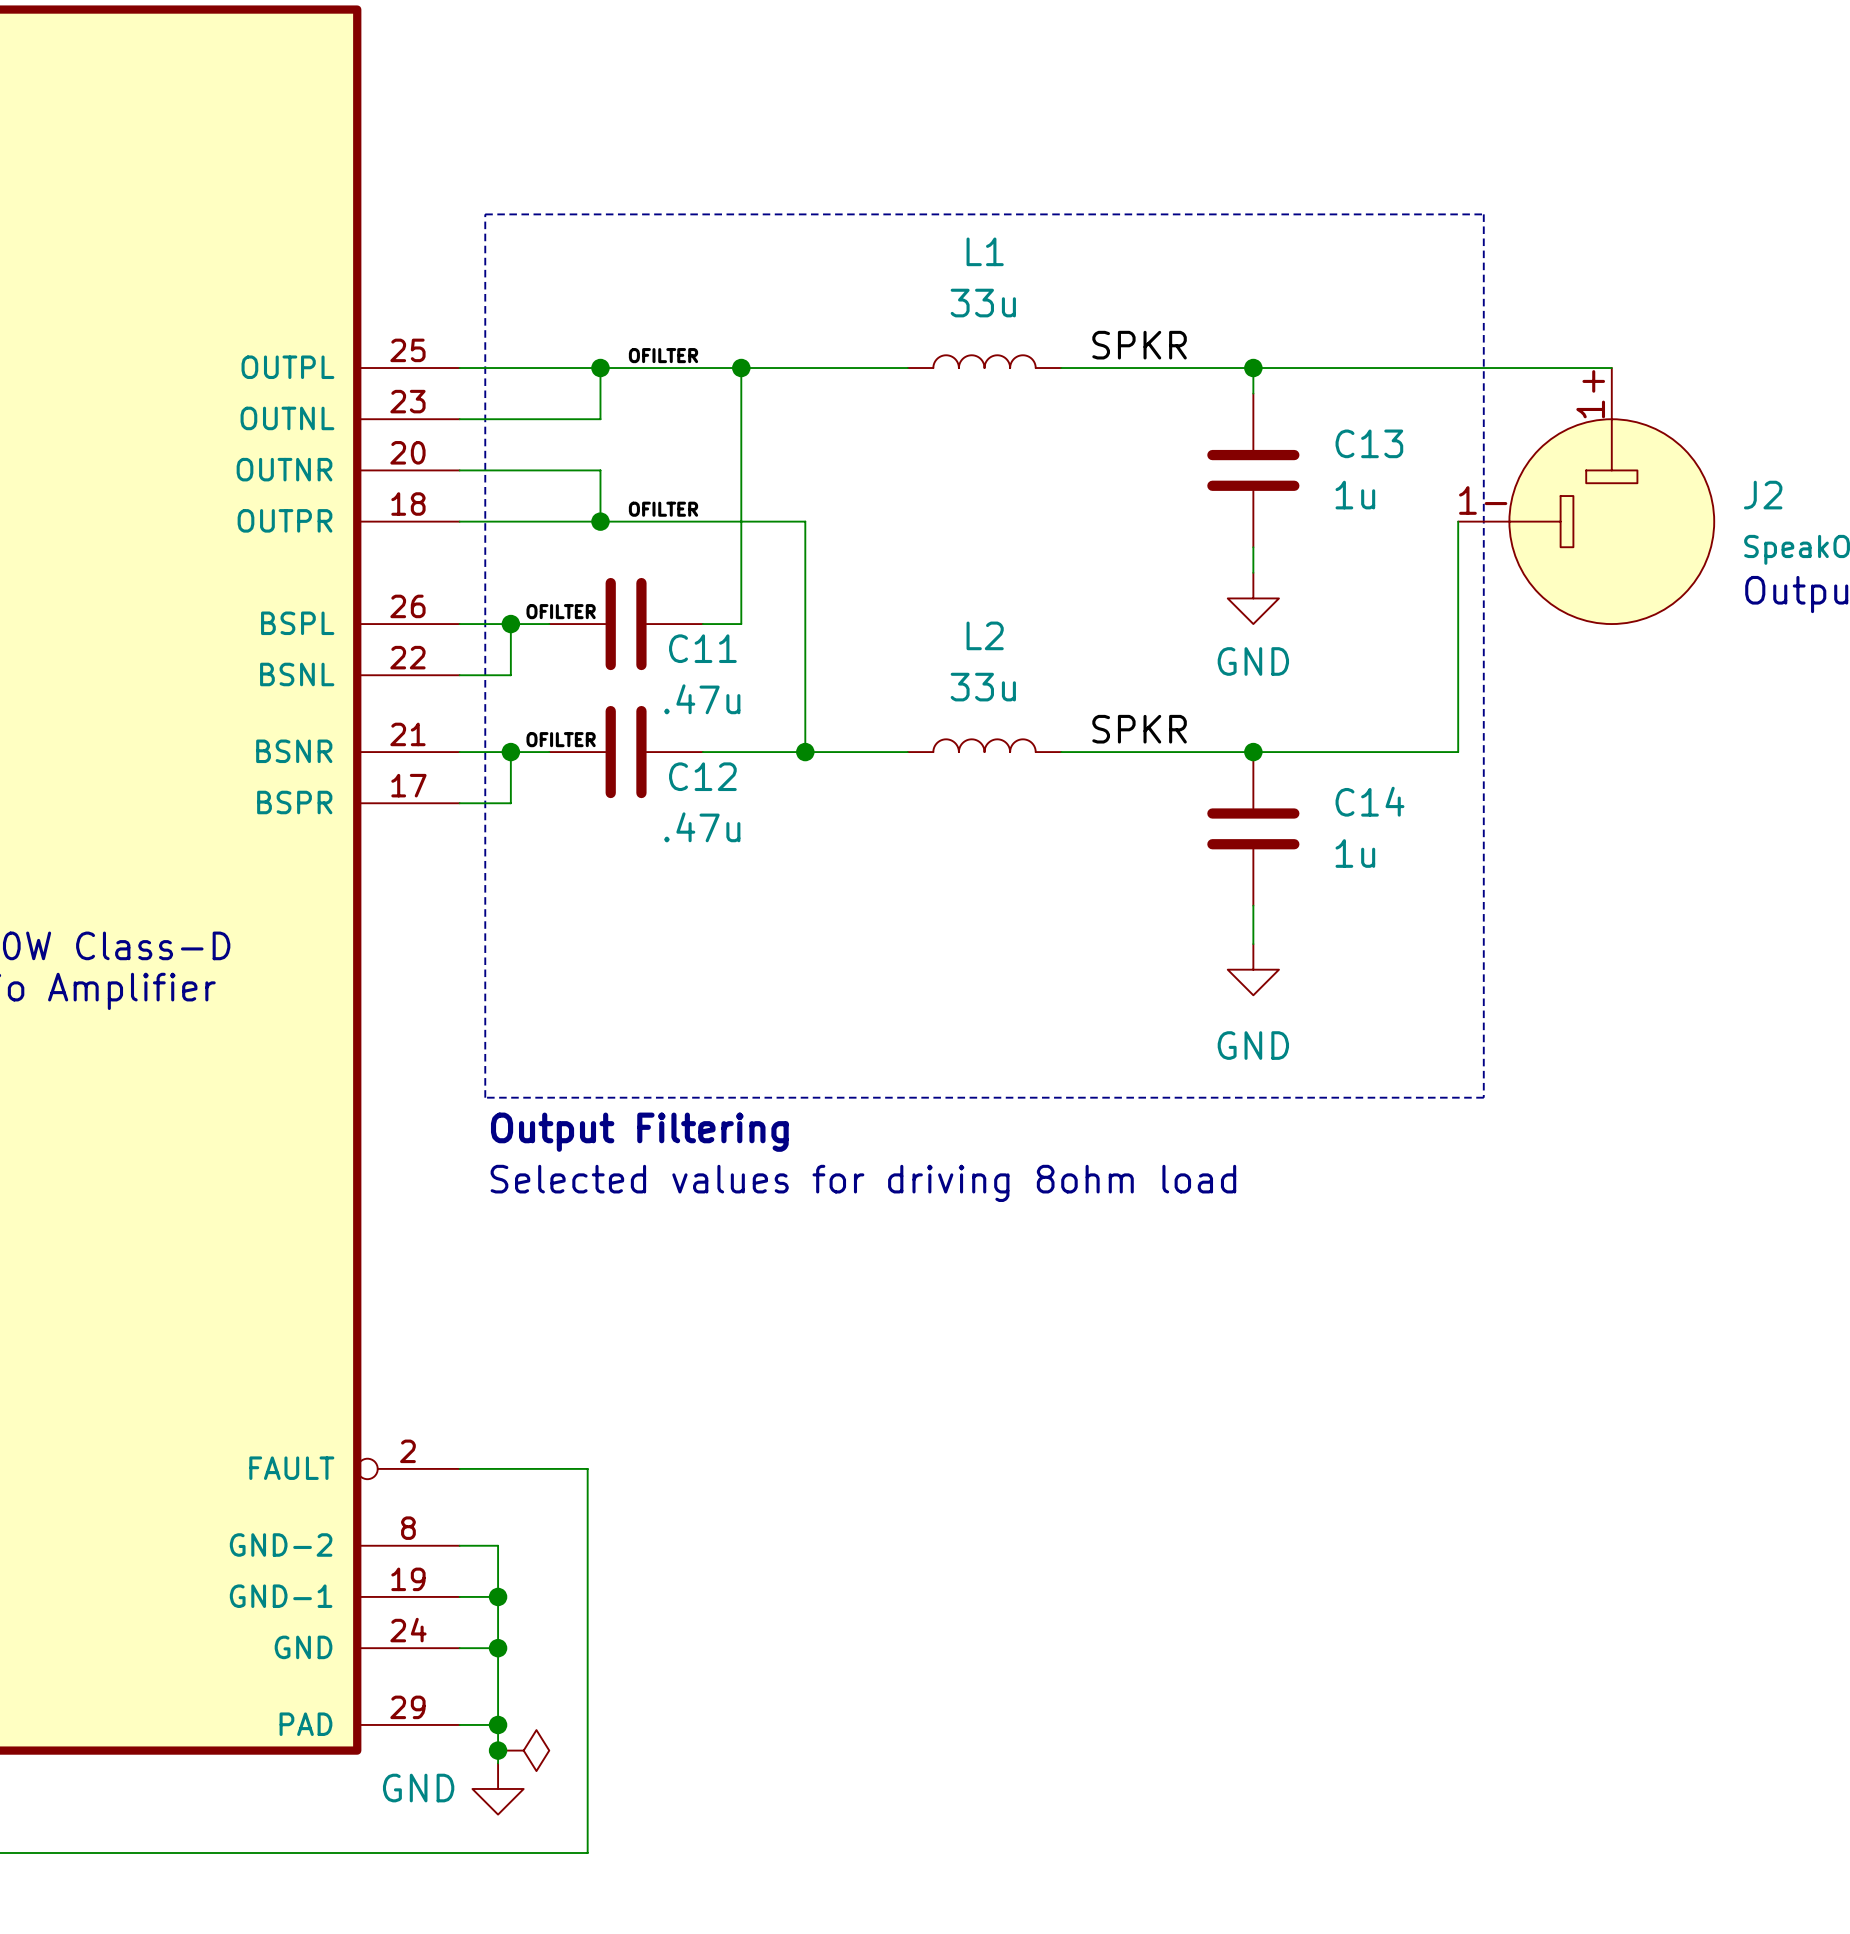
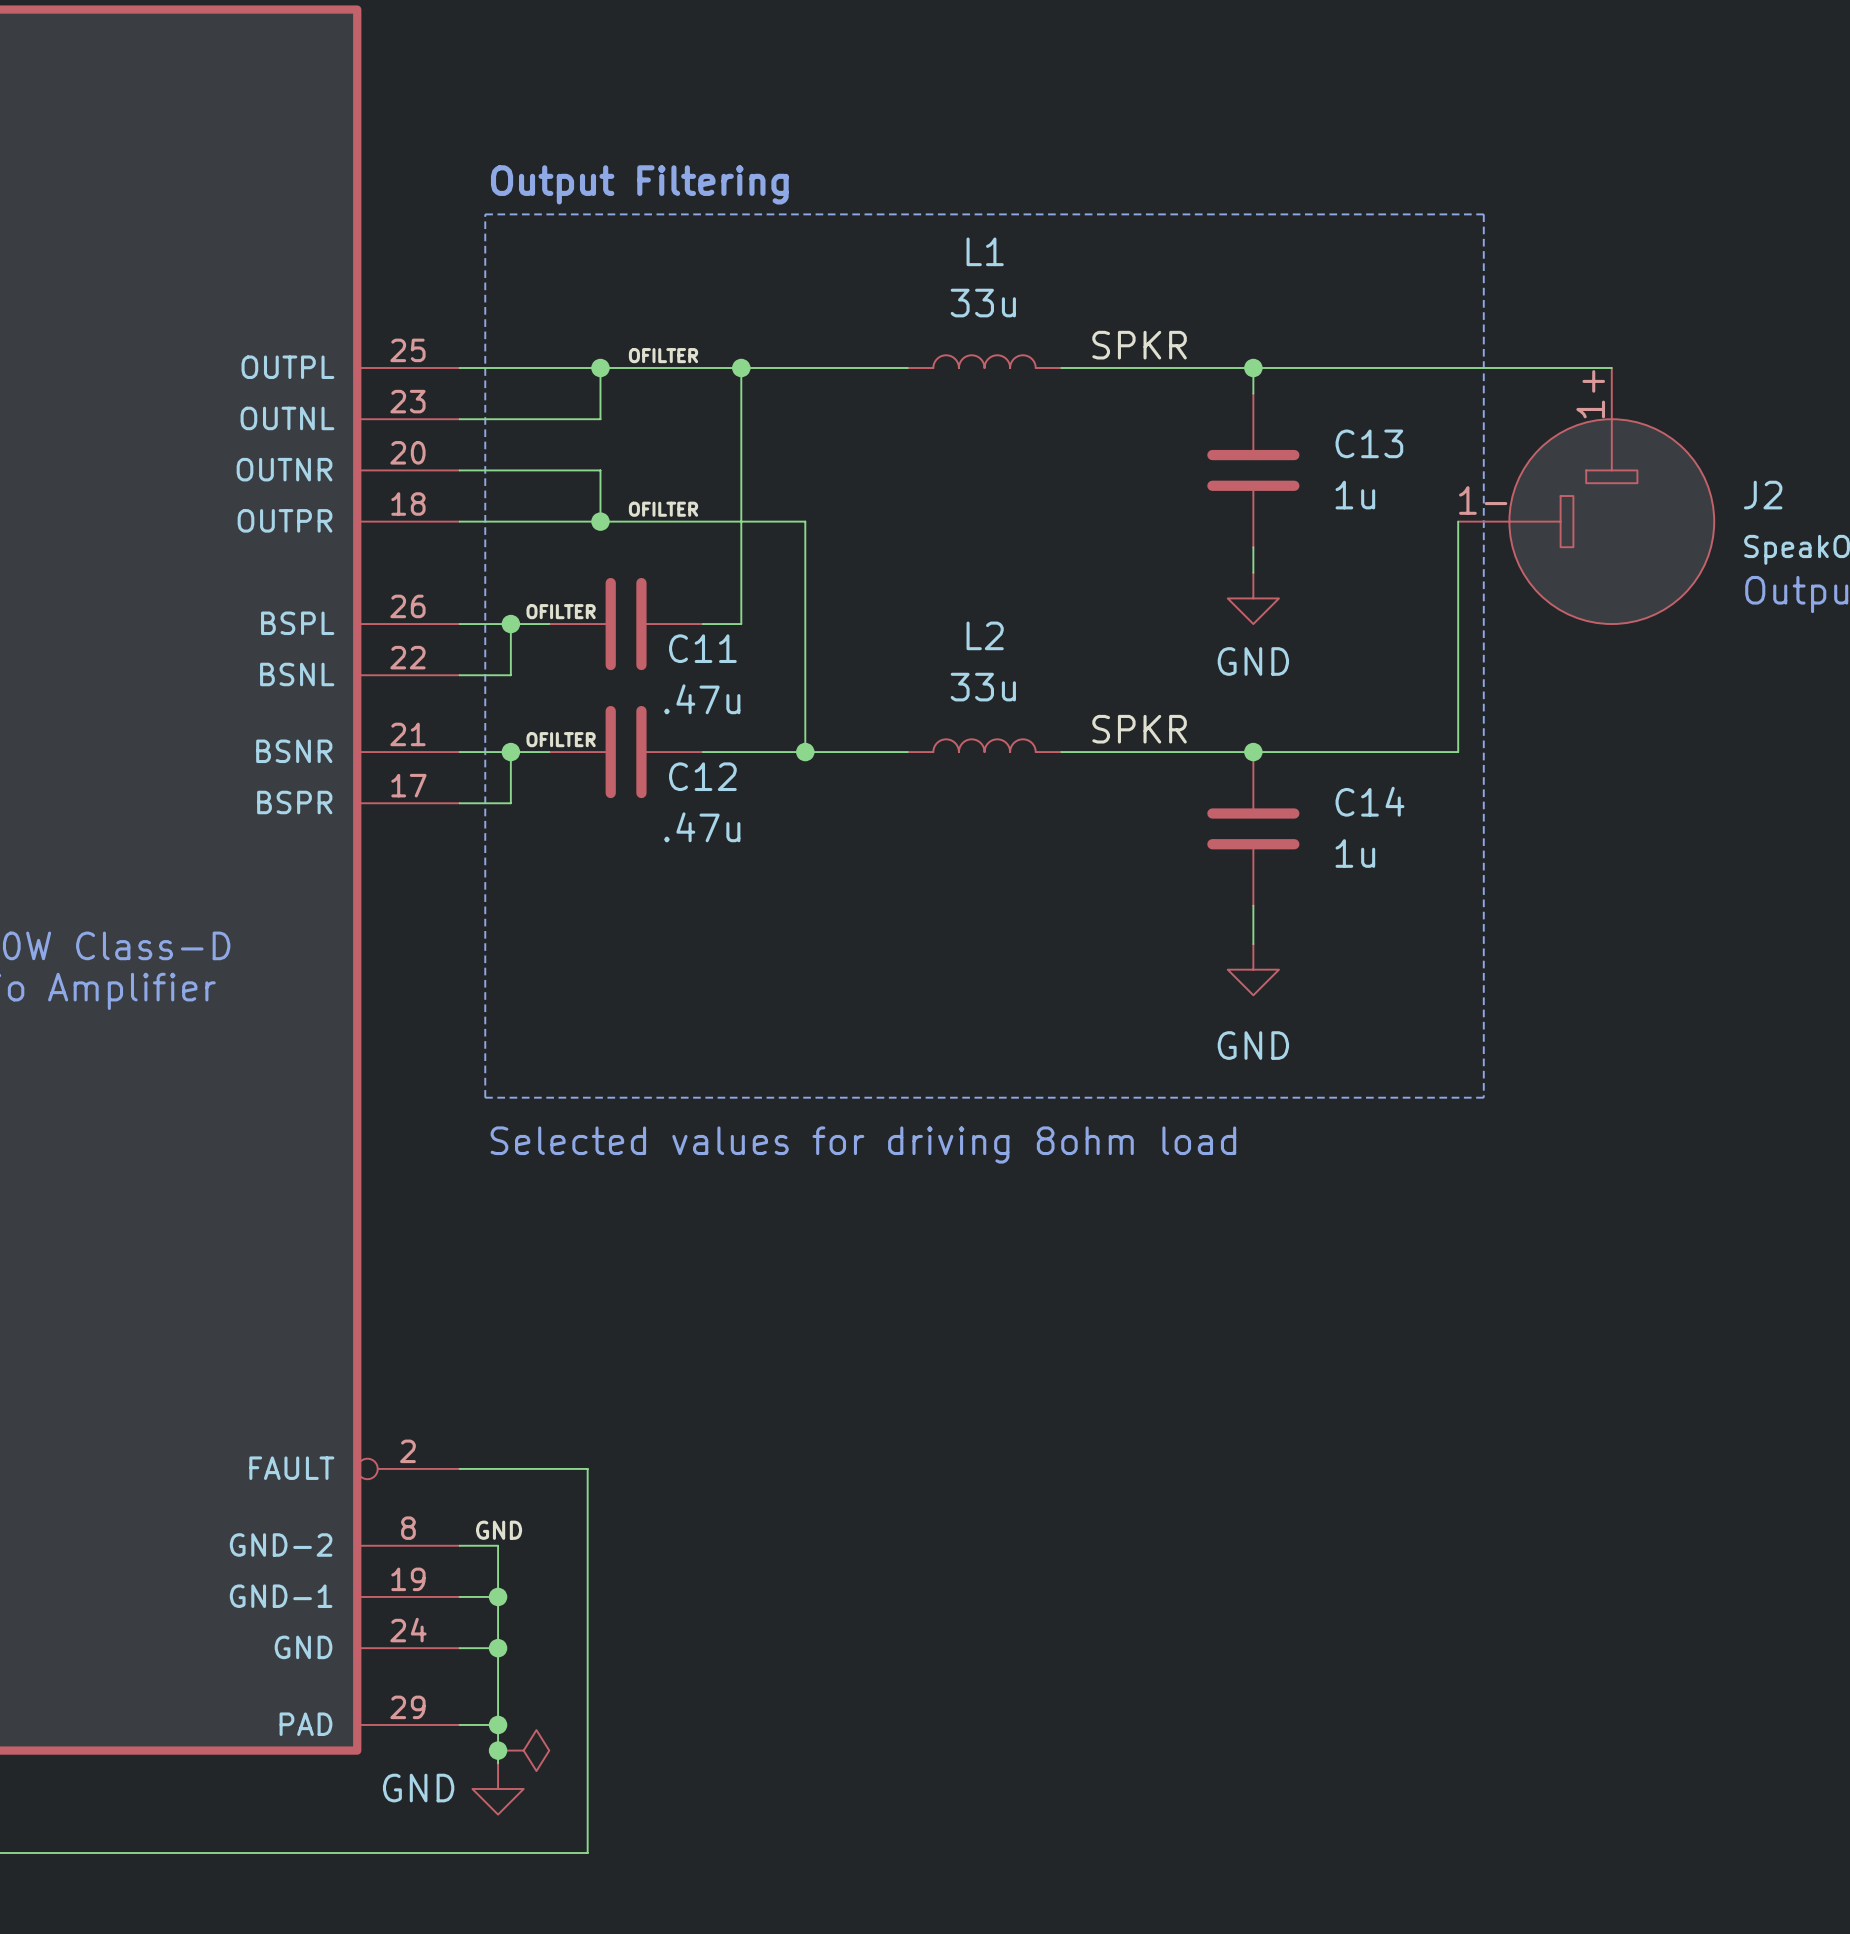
text: none -> Output Filtering (639, 184)
text: Output Filtering (639, 1132) -> none
text position: Selected values for driving 8ohm load (863, 1183) -> Selected values for driving 8ohm load (863, 1145)
label: none -> GND (499, 1530)

